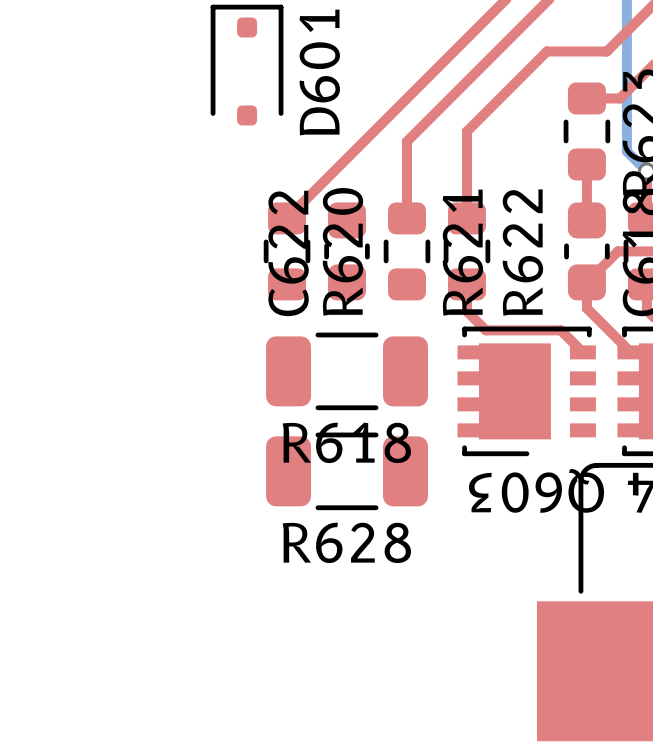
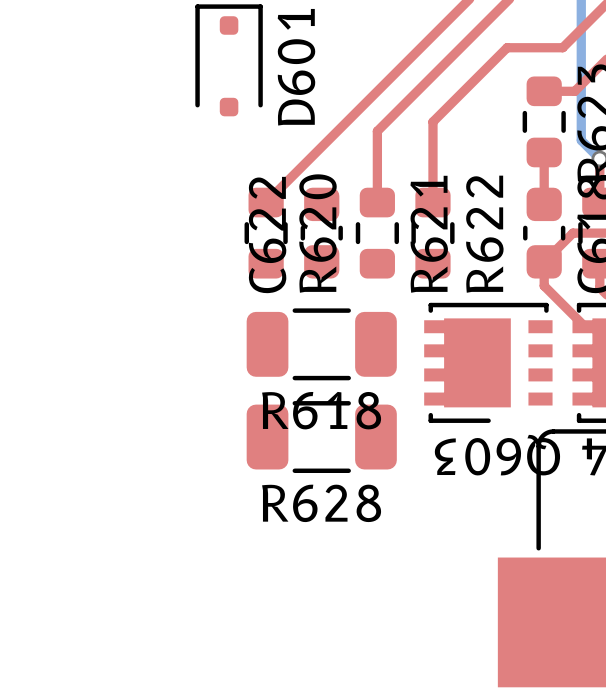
top track: (466, 284) (466, 311) (485, 330) (560, 330) (582, 352) -> none

